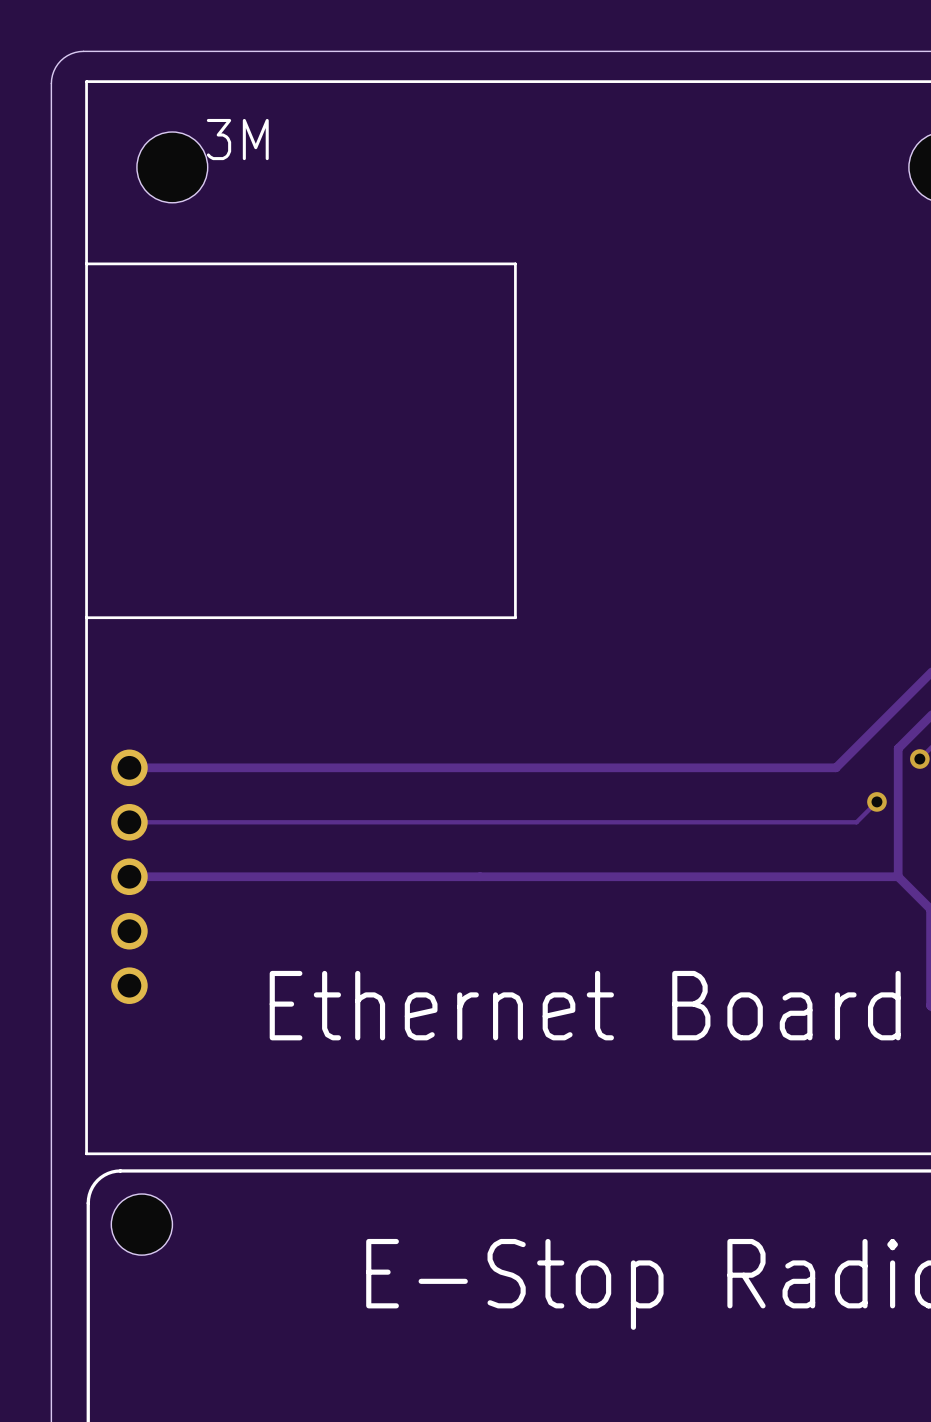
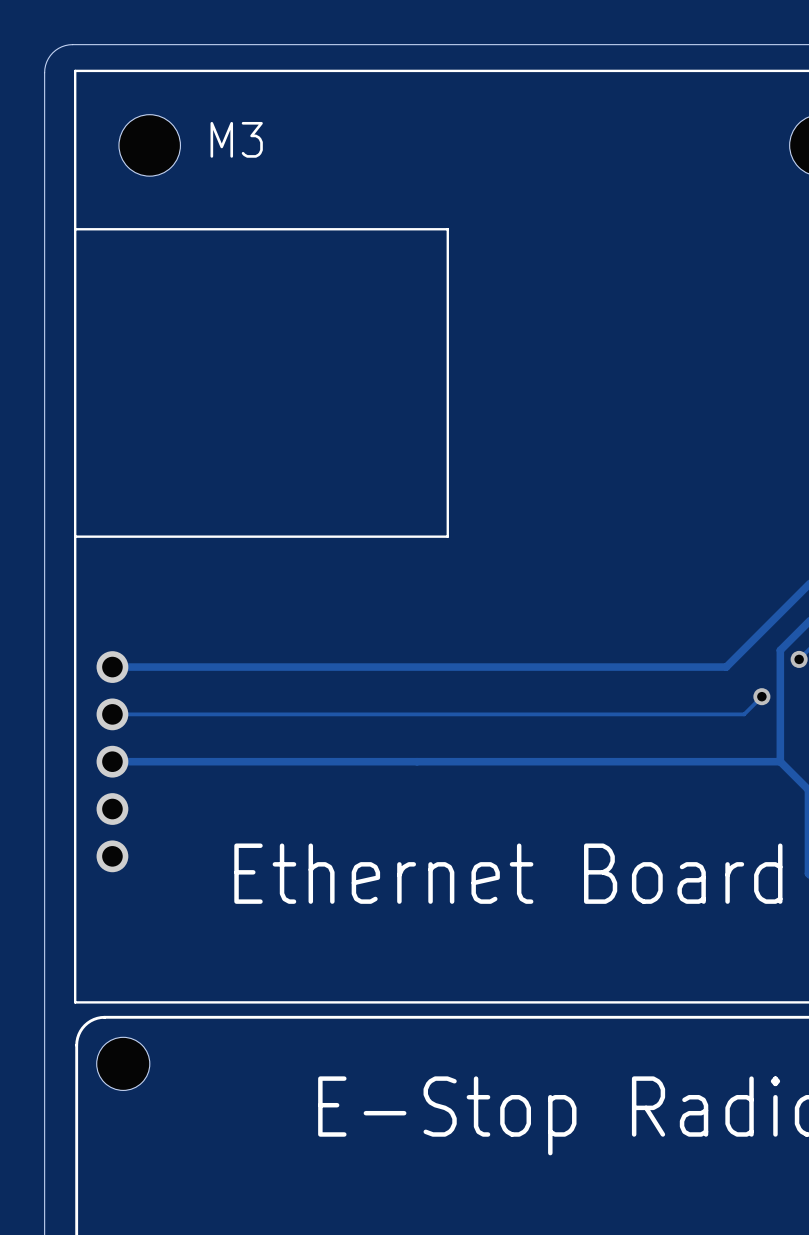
text: 3M (237, 139) -> none
text: none -> M3 (236, 139)

